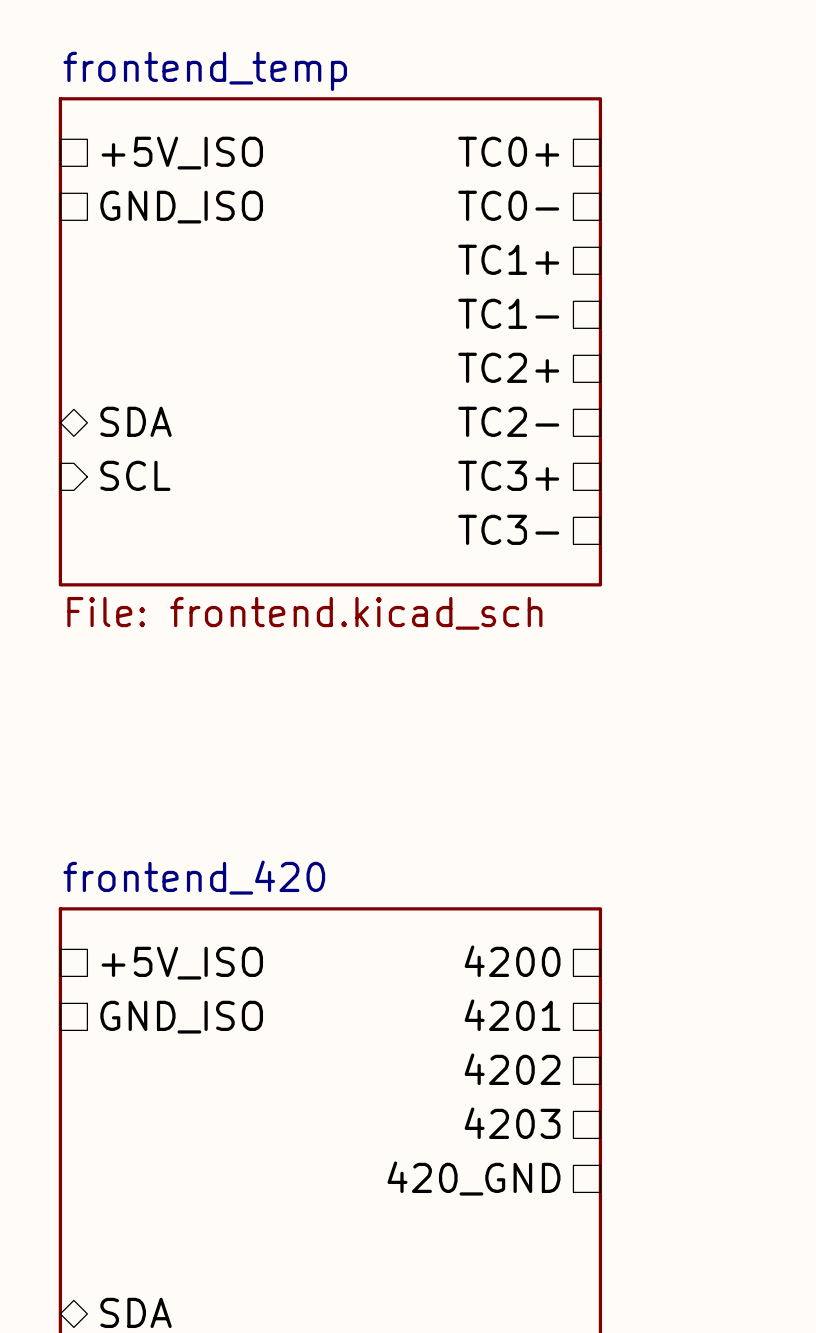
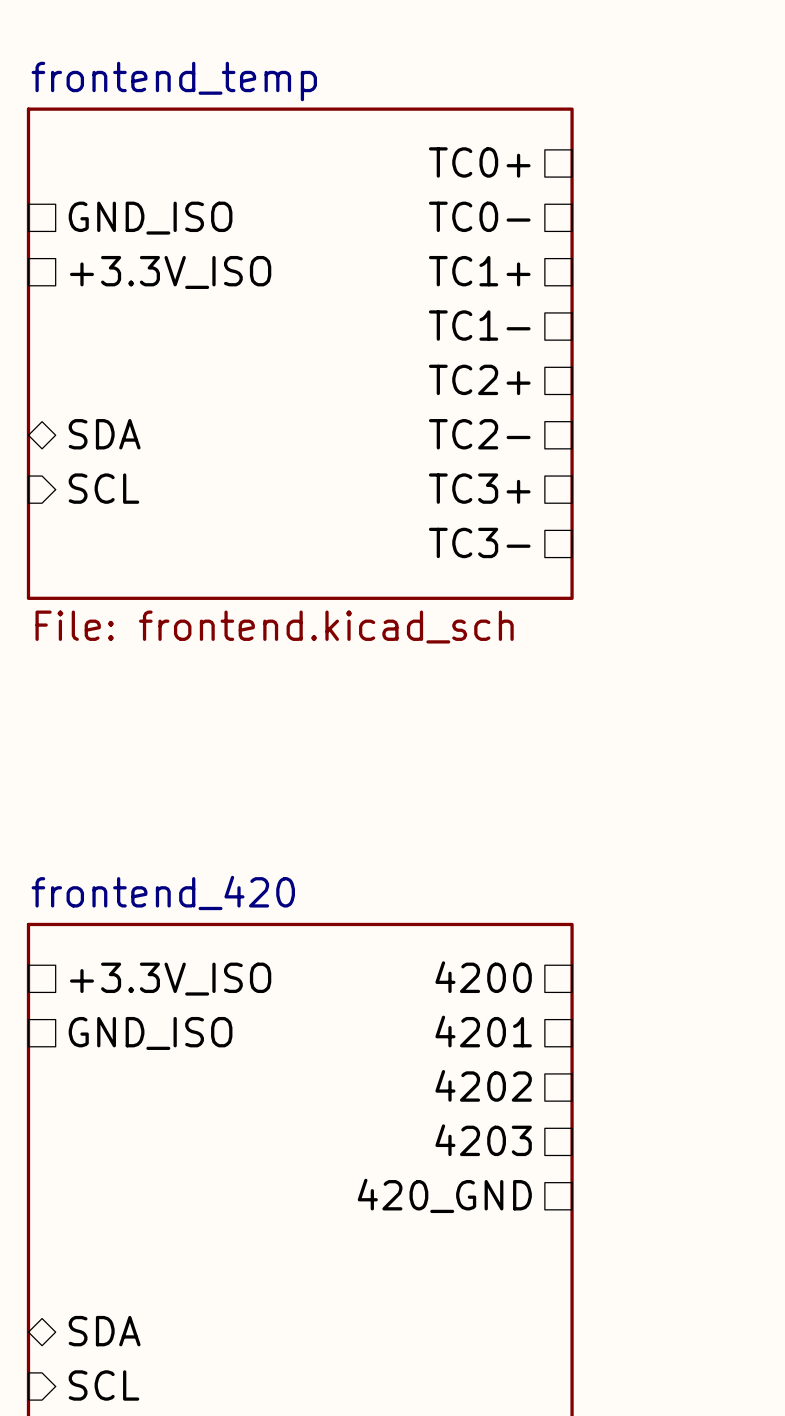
sheet pin: +5V_ISO (182, 153) -> none
sheet pin: none -> +3.3V_ISO (170, 272)
sheet pin: +5V_ISO (182, 963) -> +3.3V_ISO (170, 979)

